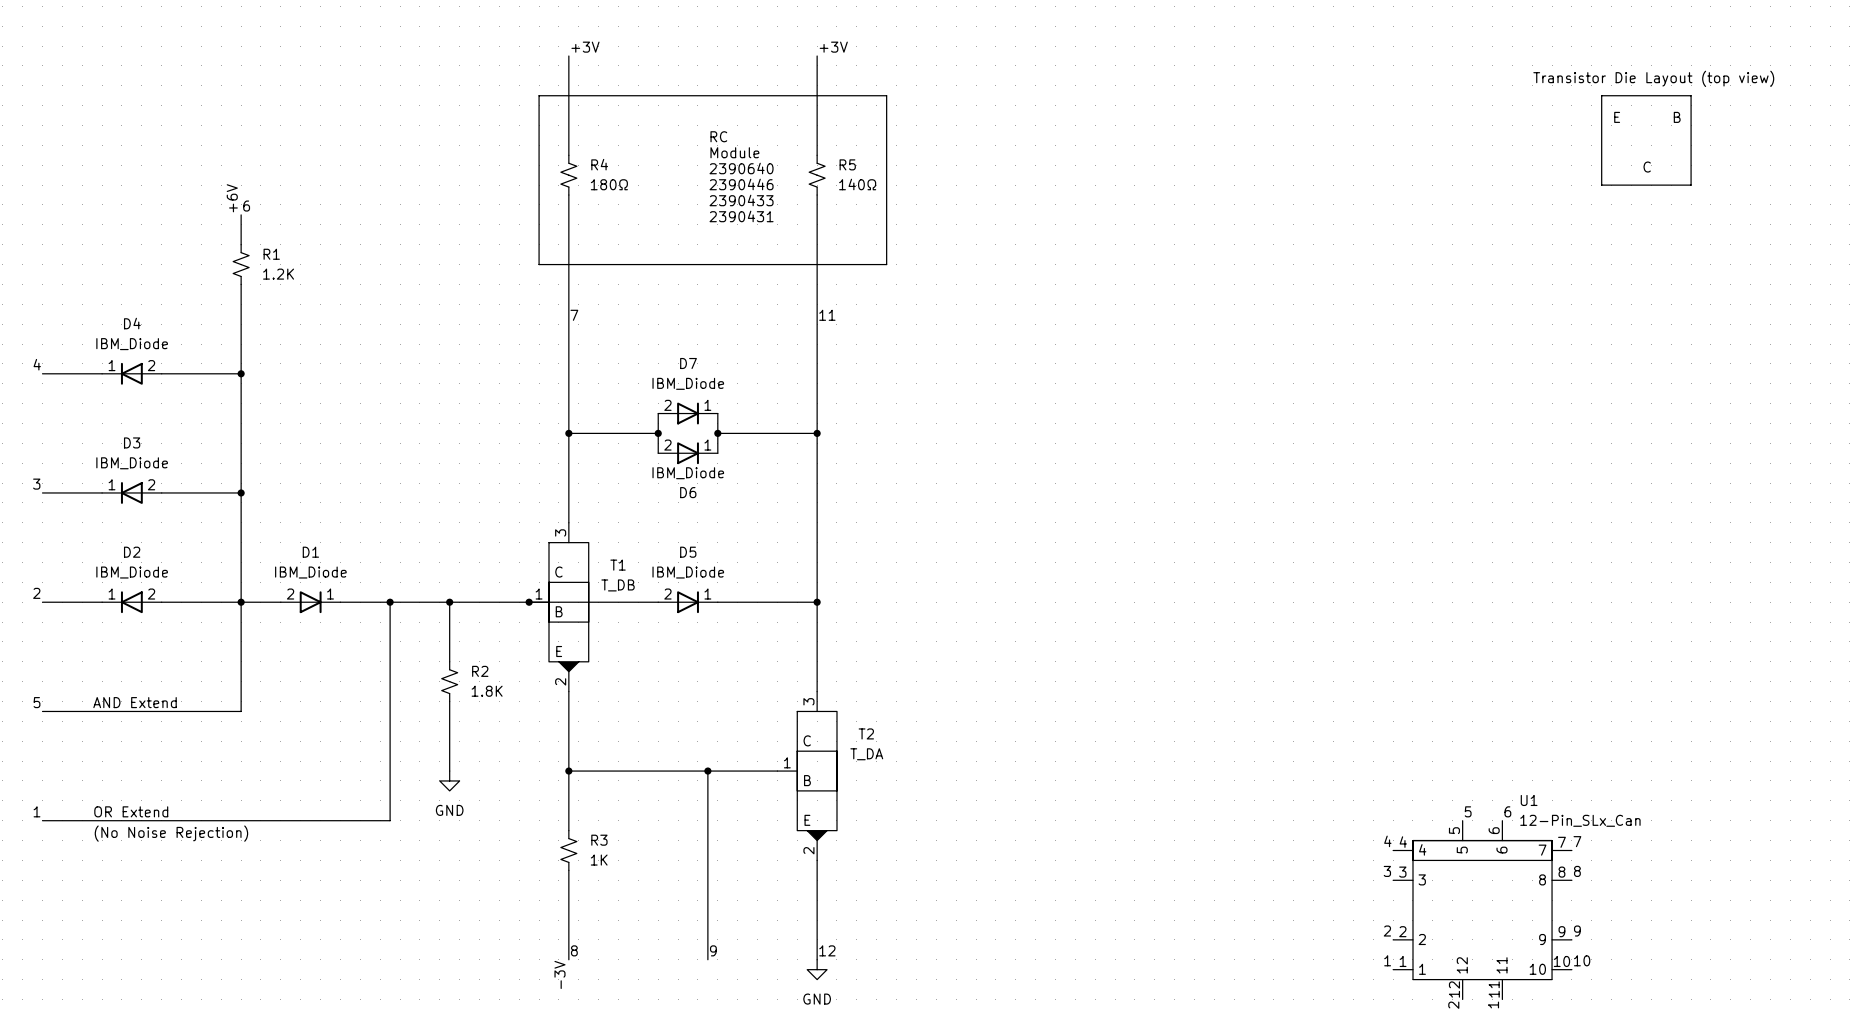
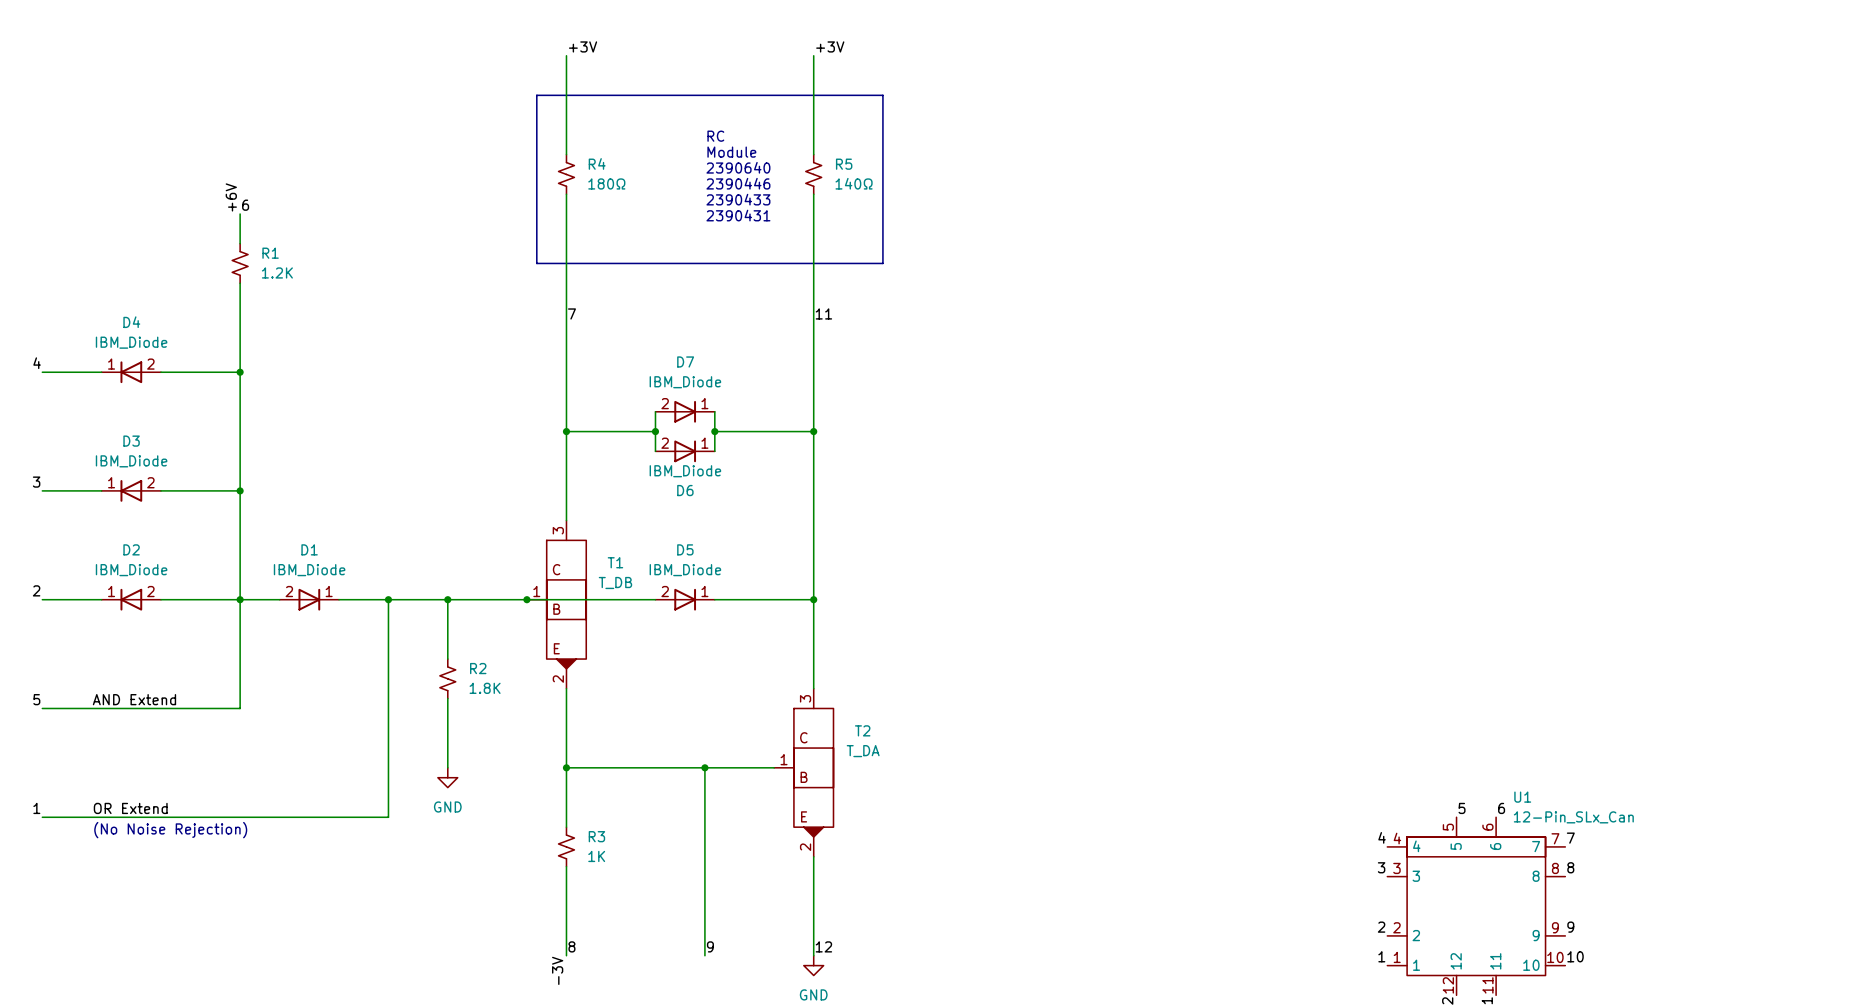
text: Transistor Die Layout (top view) (1653, 78) -> none
line: (1601, 95) (1601, 185) (1691, 185) (1691, 95) (1601, 95) -> none
text: E (1617, 117) -> none
text: B (1677, 117) -> none
text: C (1647, 167) -> none

